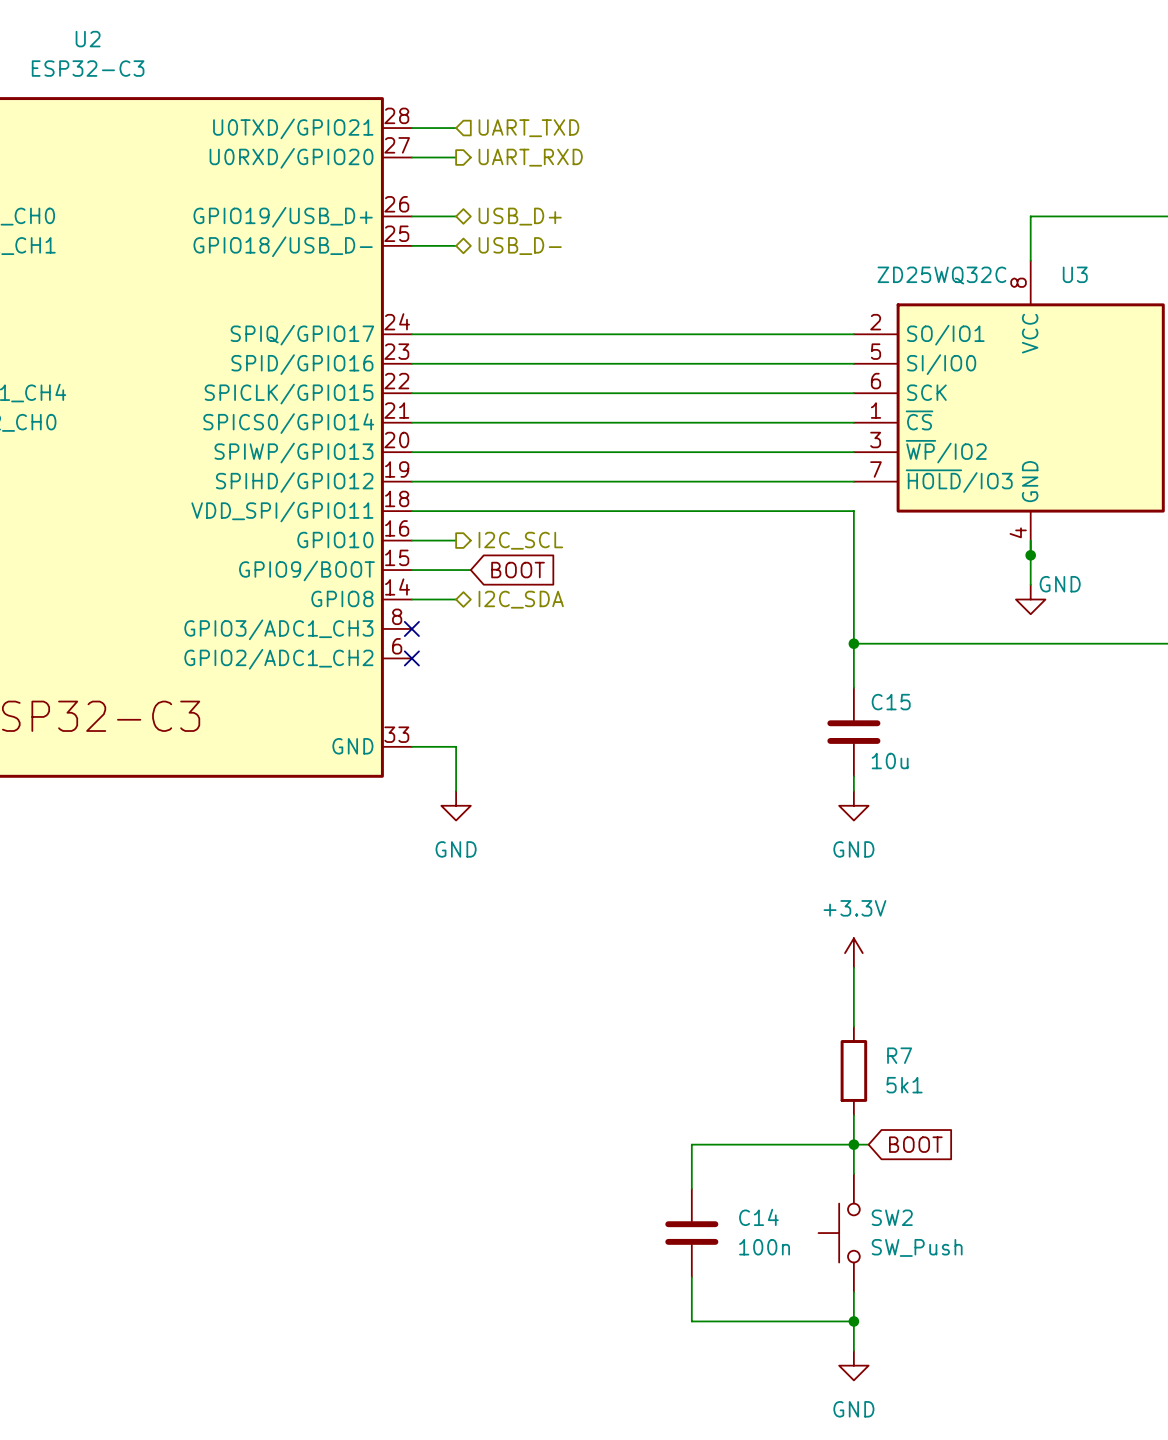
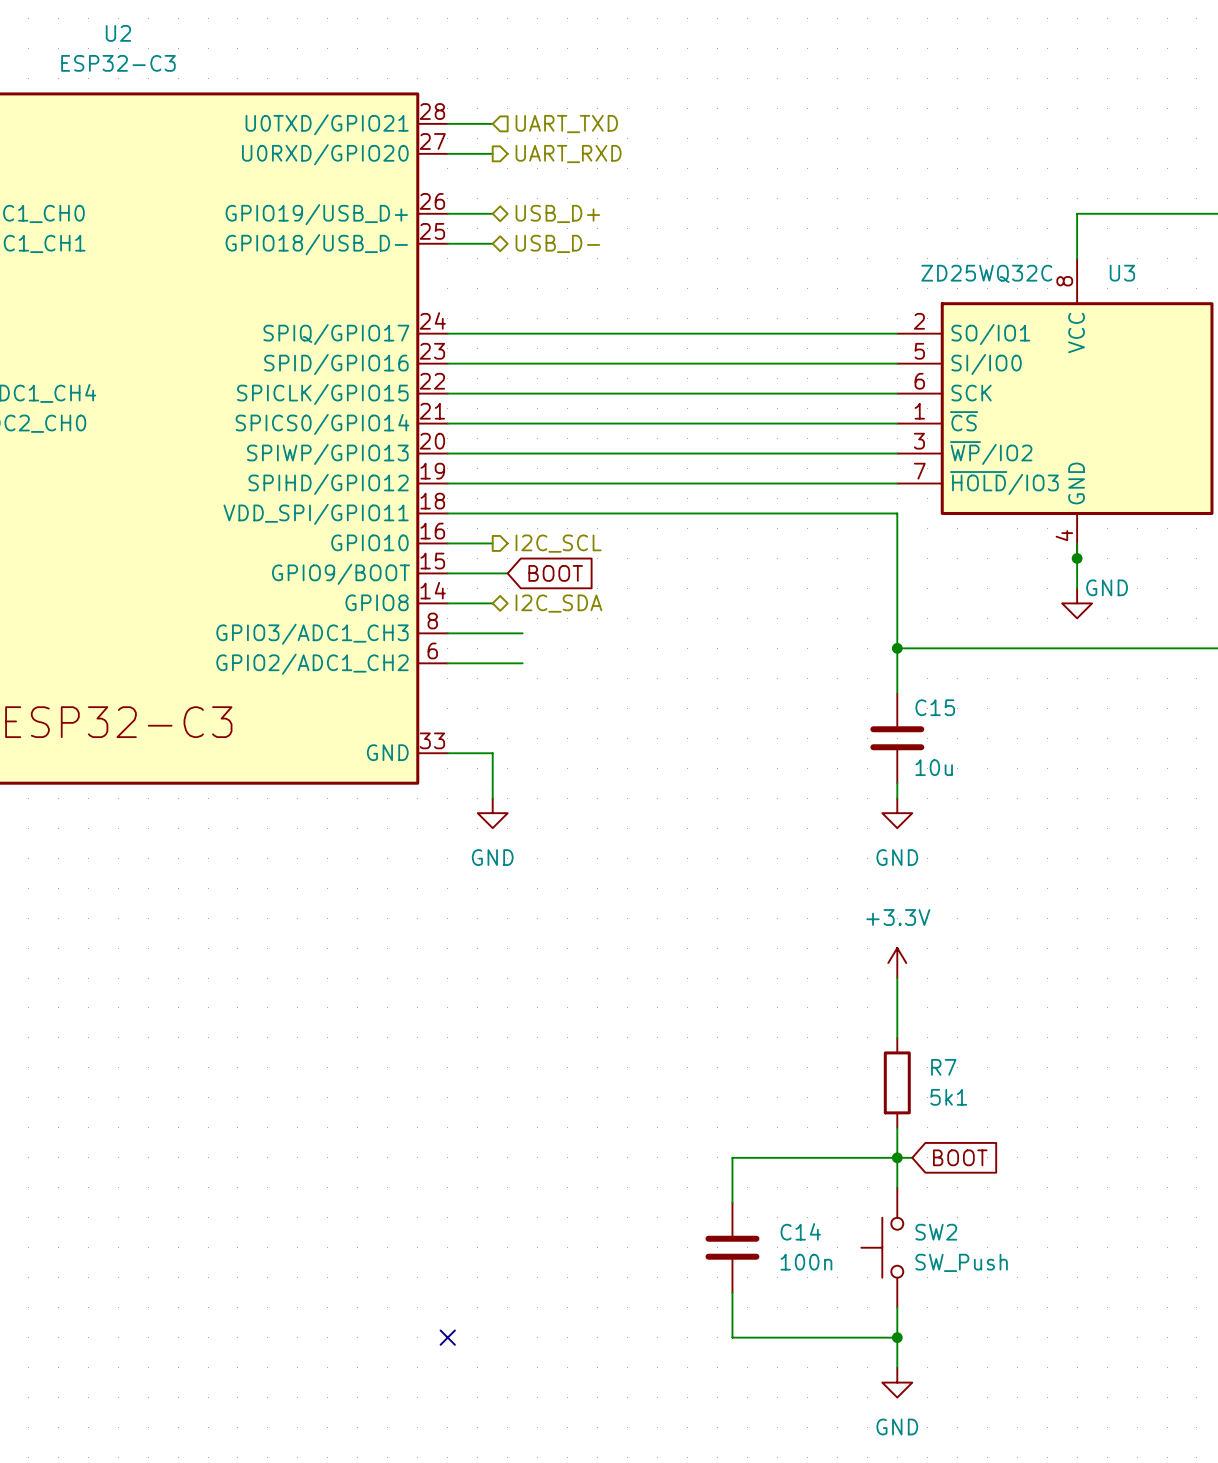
wire: none -> (447, 633) (522, 633)
no-connect mark: (411, 628) -> none
wire: none -> (447, 663) (522, 663)
no-connect mark: (411, 658) -> none
no-connect mark: none -> (447, 1337)

